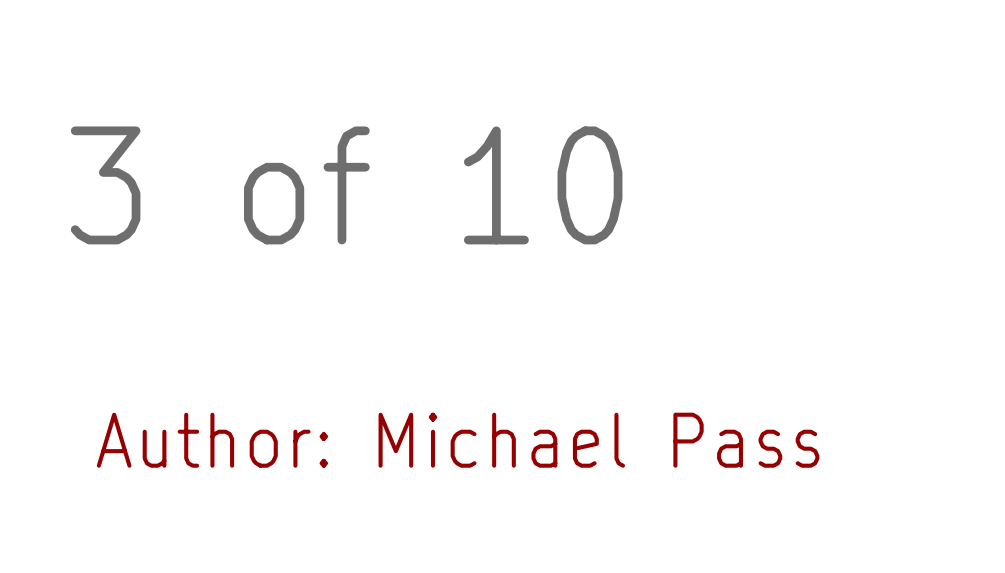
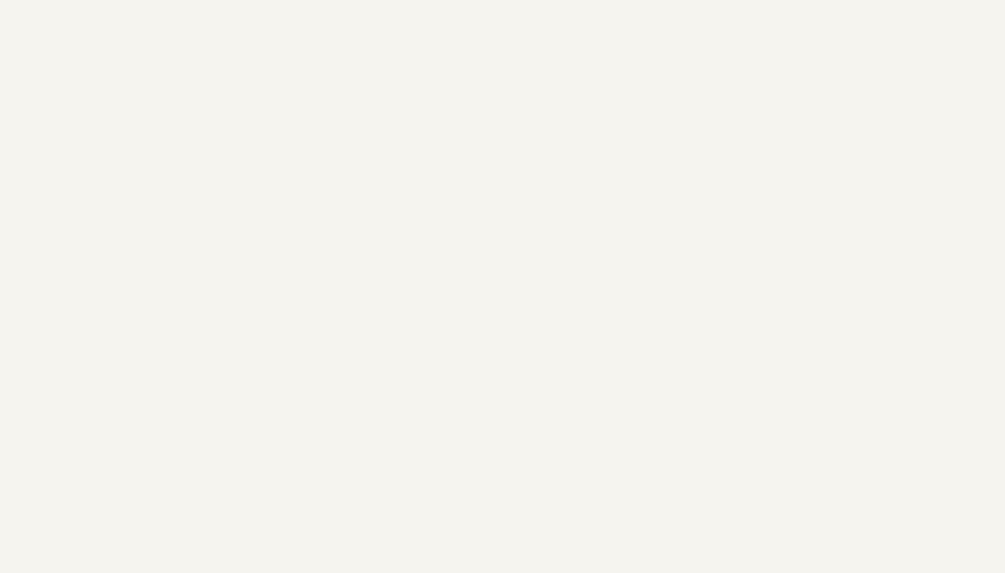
text: 3 of 10 (346, 185) -> none
text: Author: Michael Pass (458, 440) -> none

